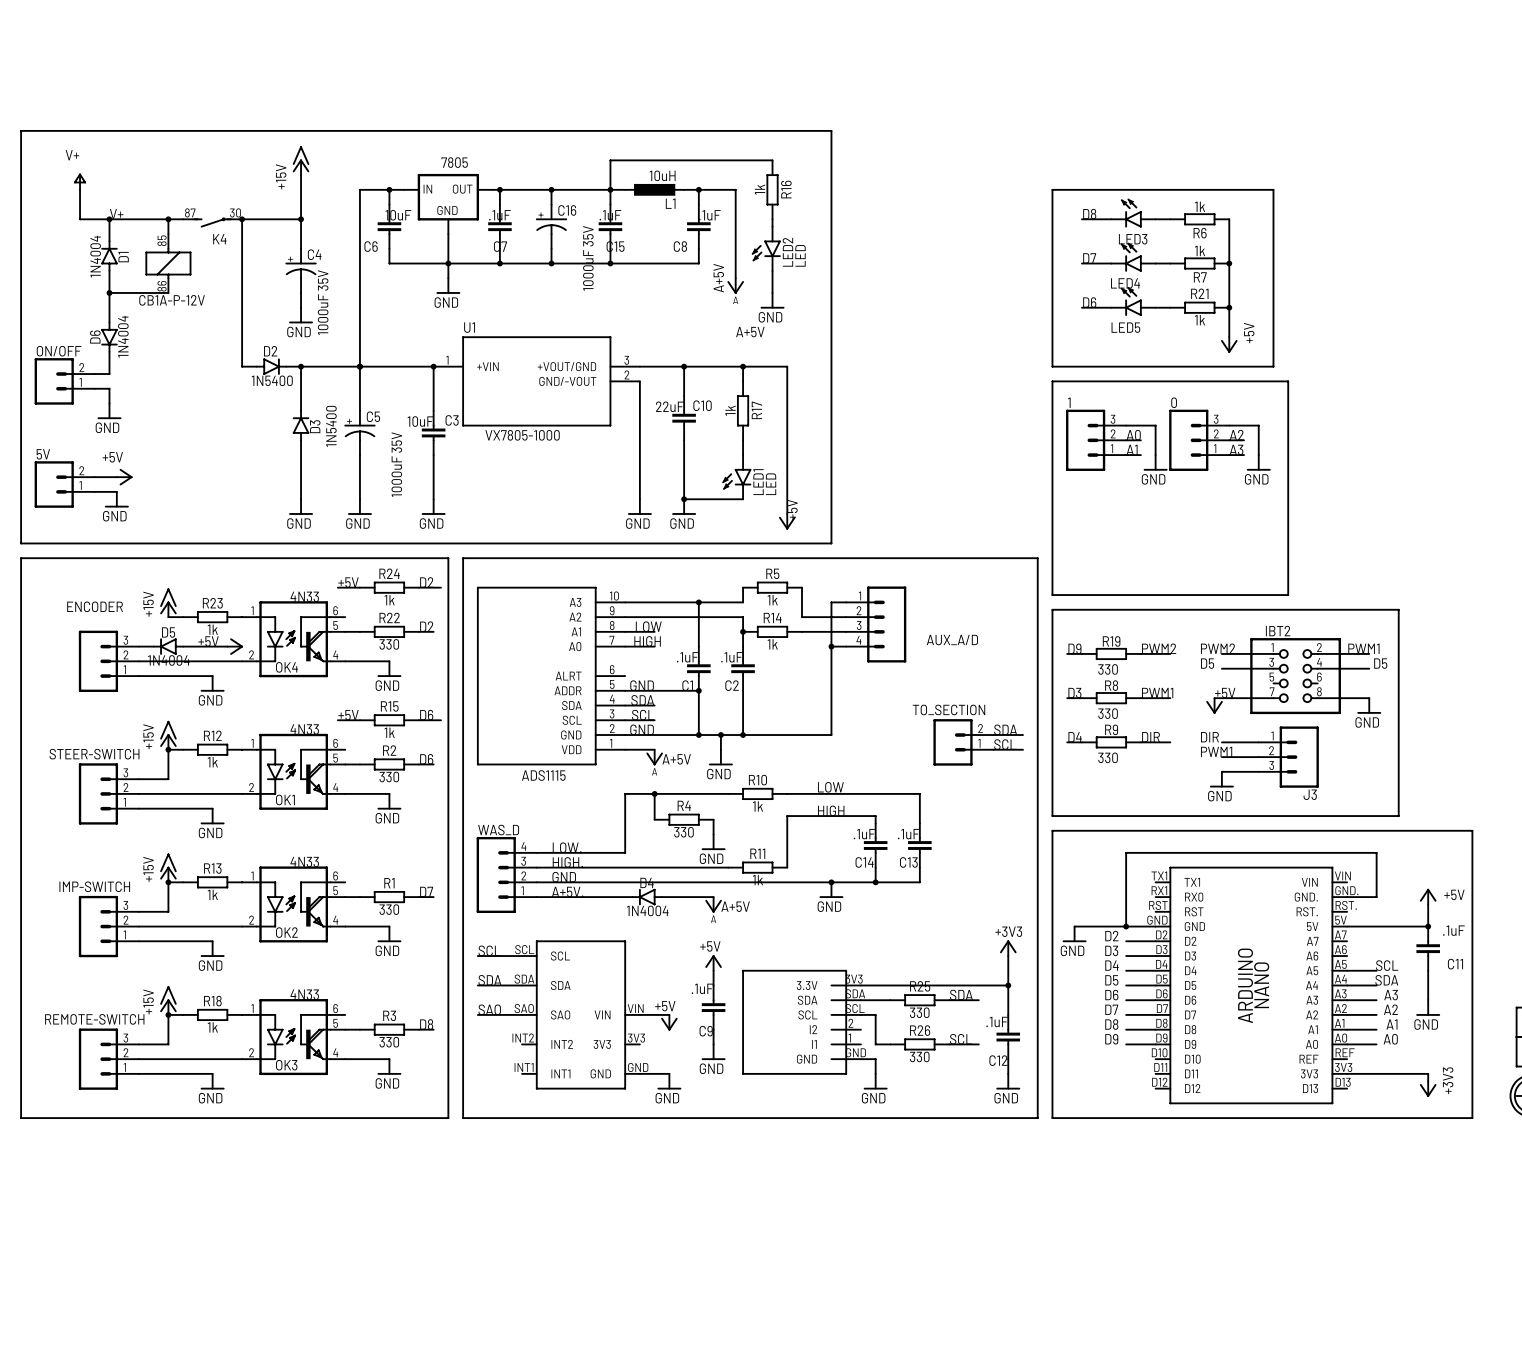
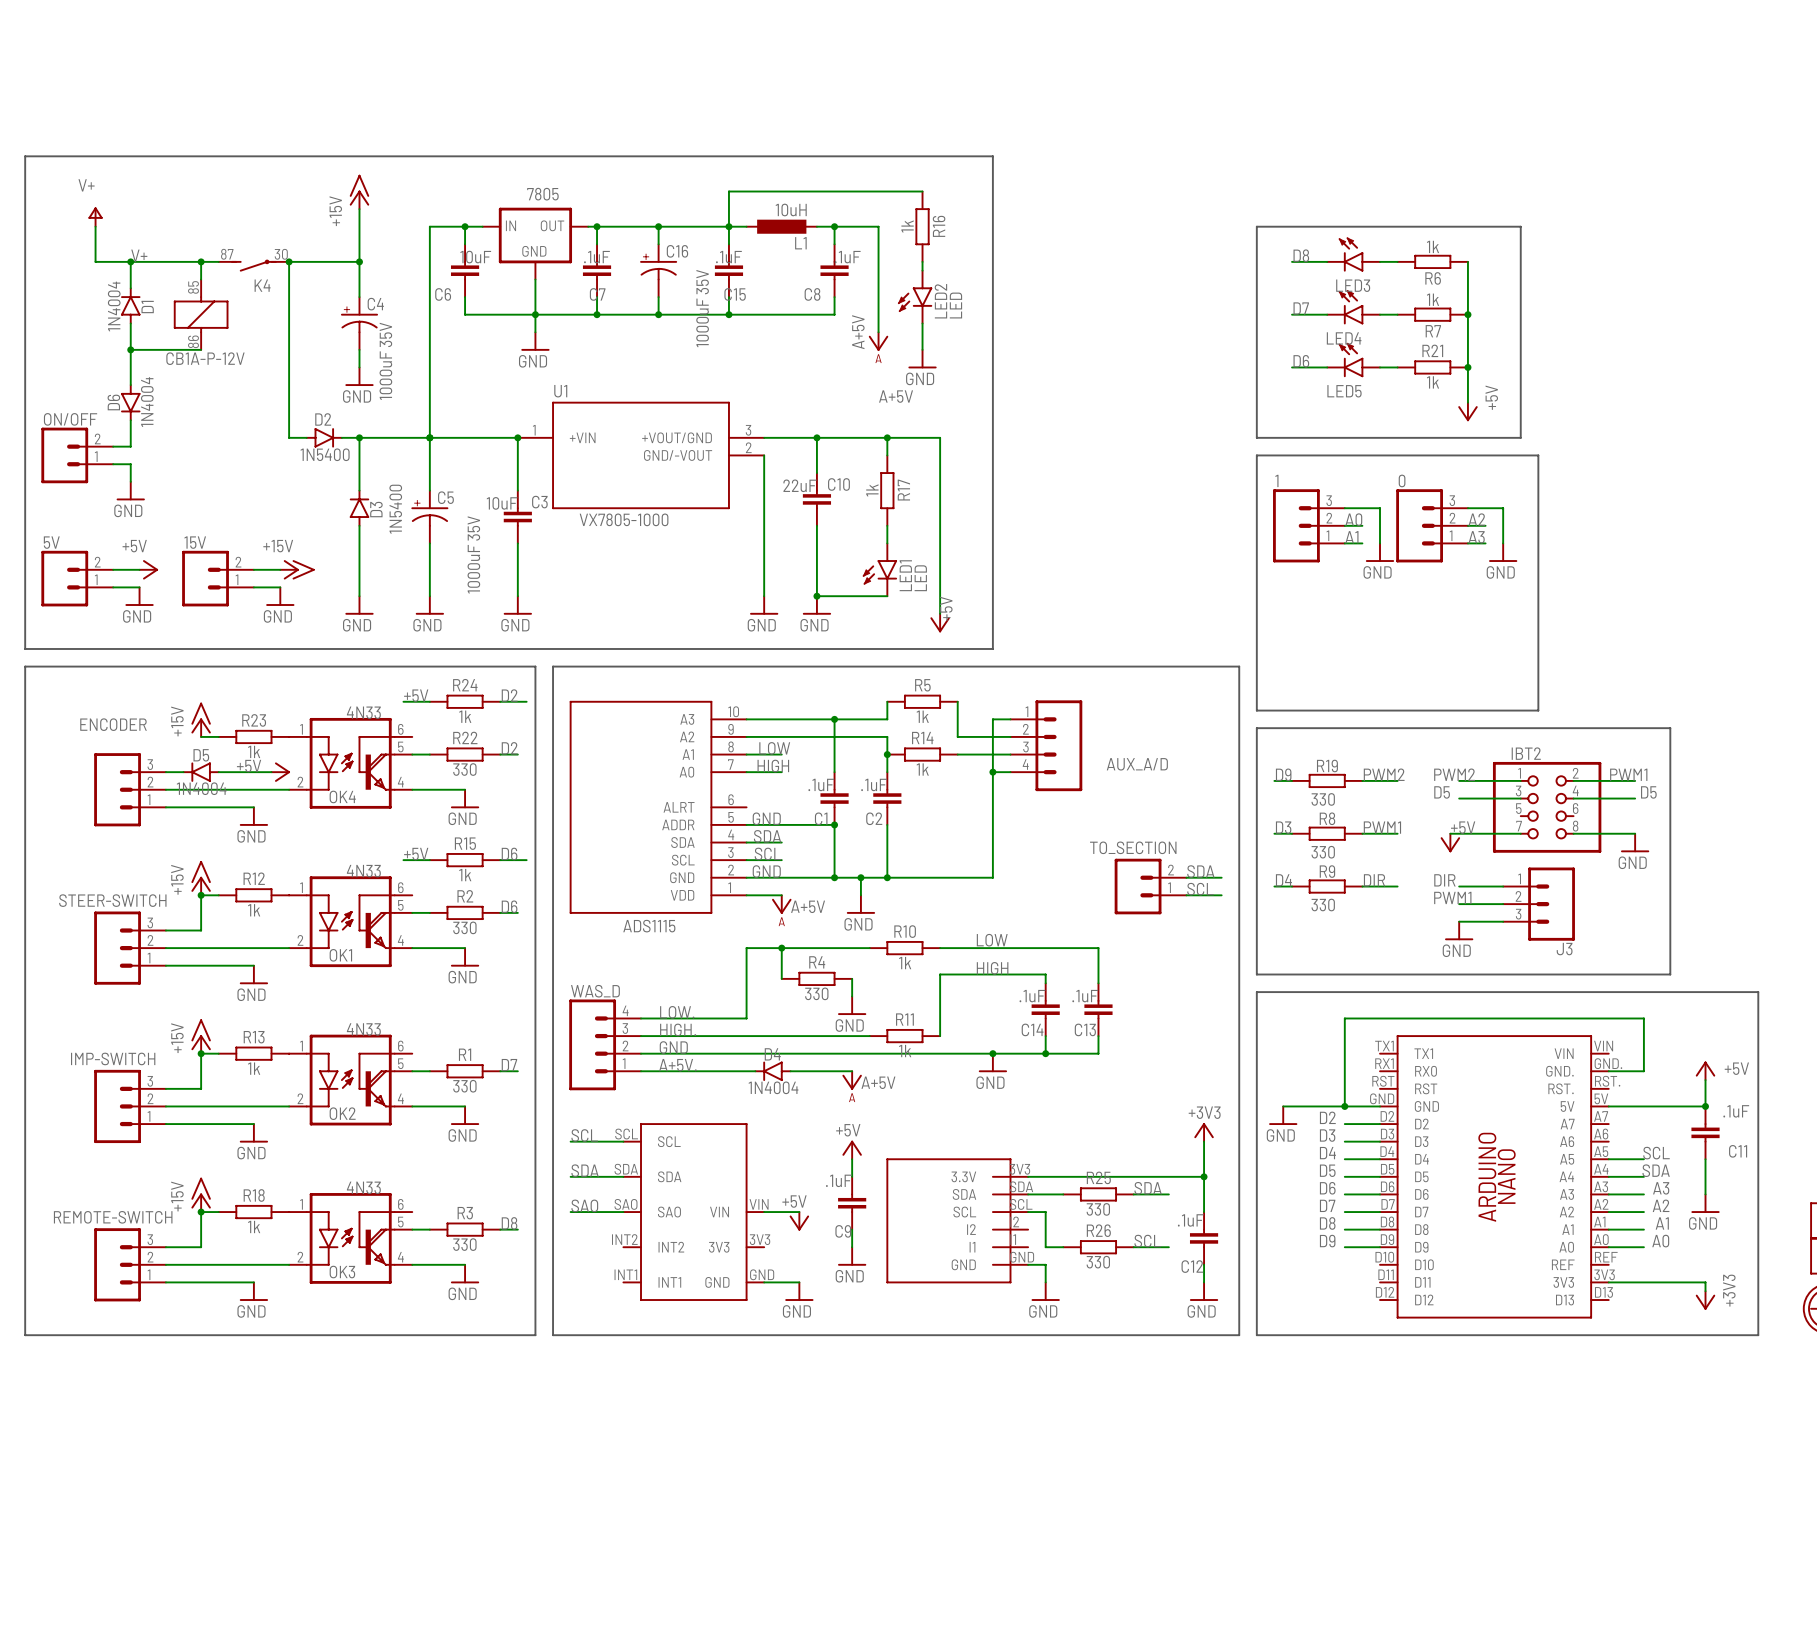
wire: none -> (253, 569) (280, 569)
power symbol: none -> +15V (297, 569)
15V: none -> (218, 578)
wire: none -> (253, 587) (280, 587)
power symbol: none -> GND (280, 596)

